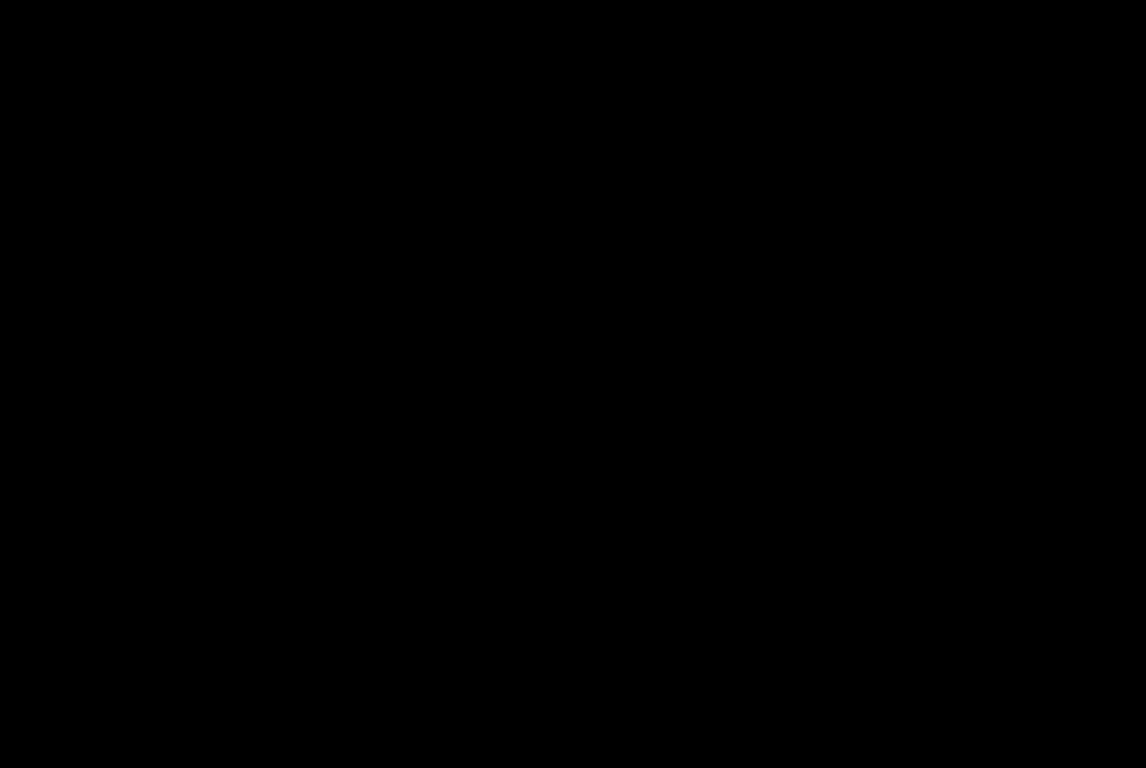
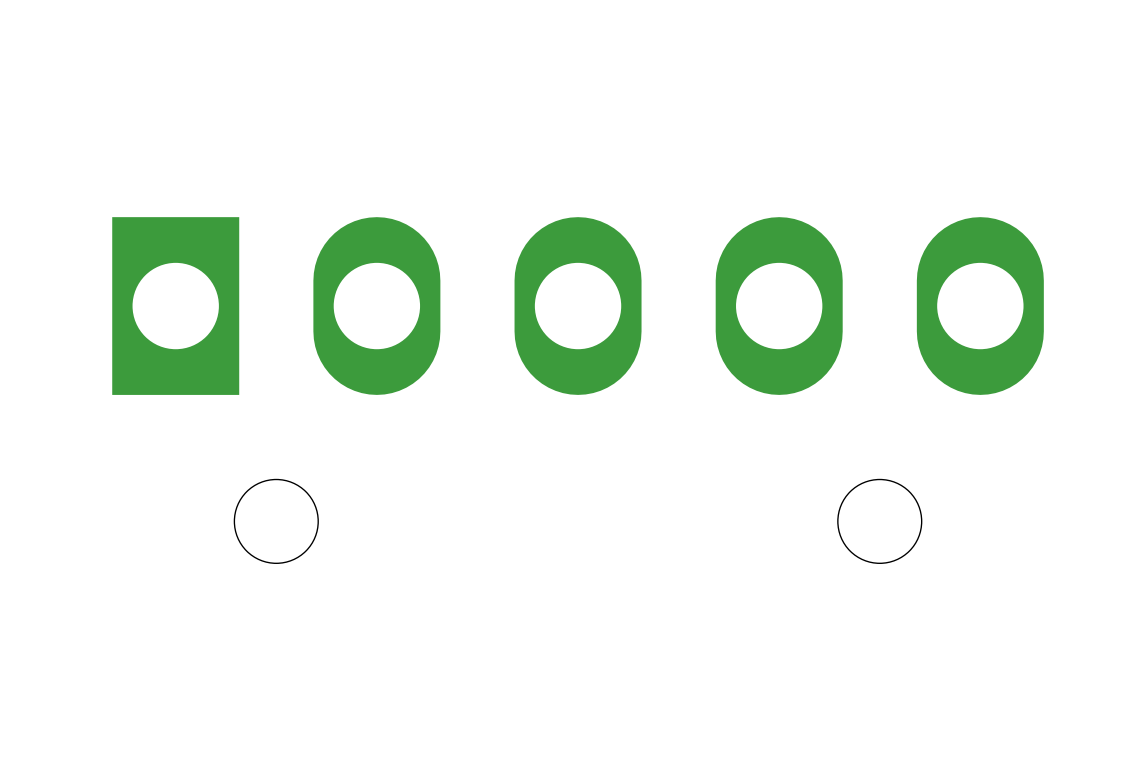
part: none -> (578, 390)

